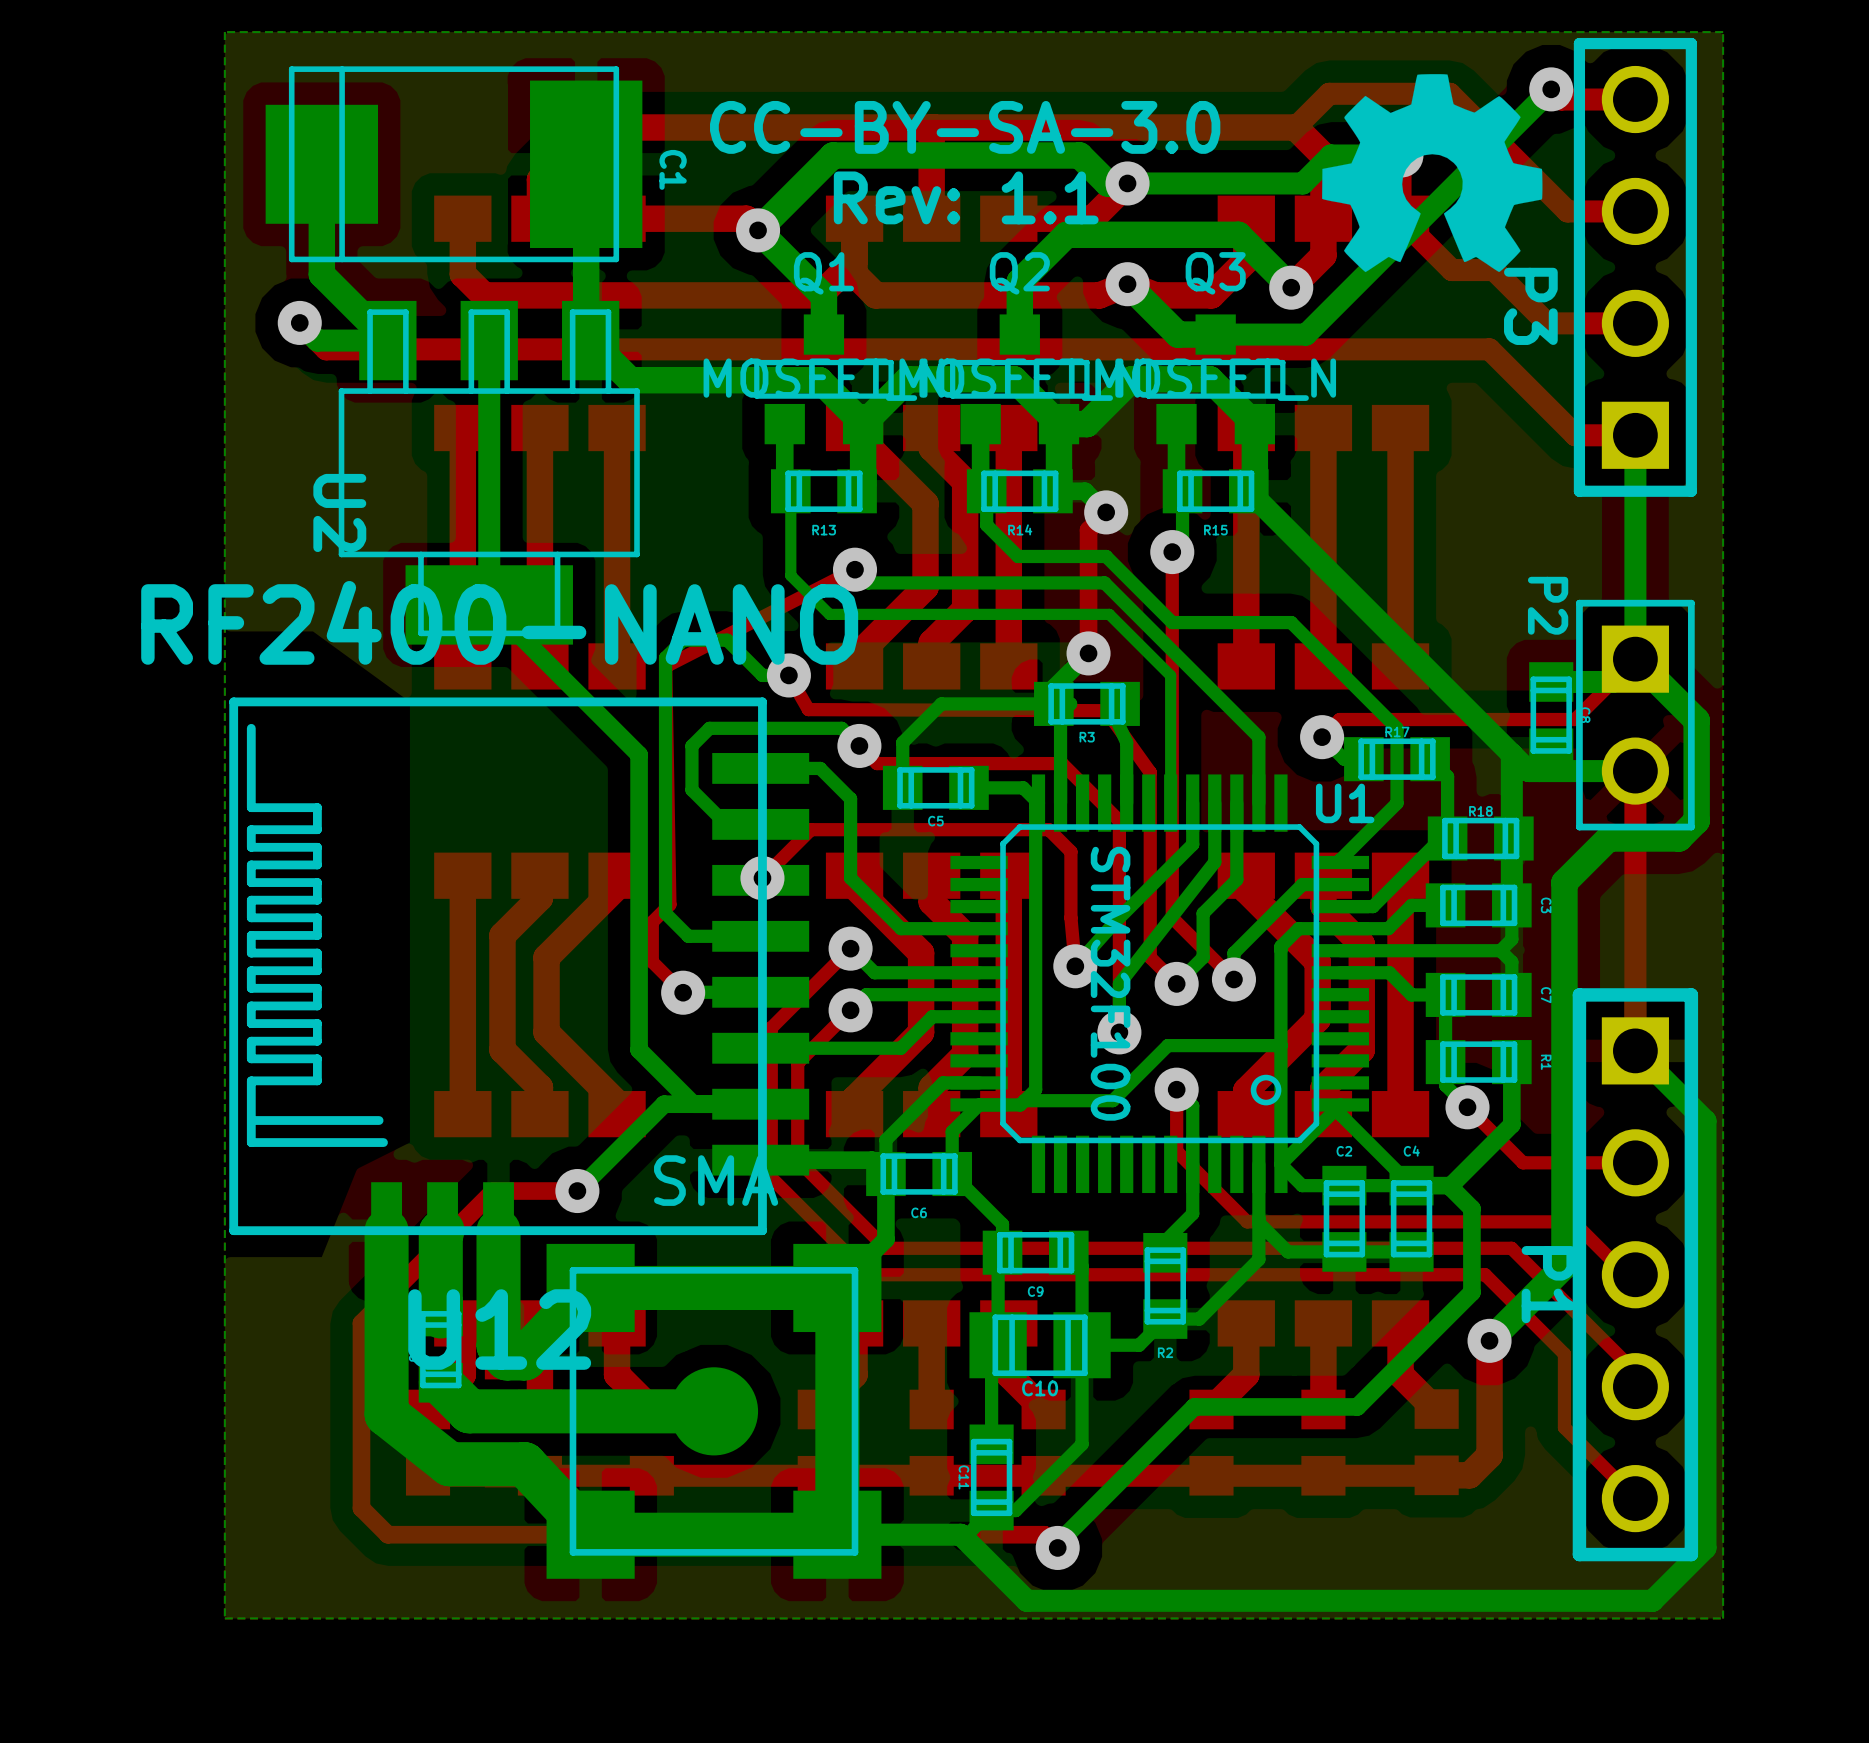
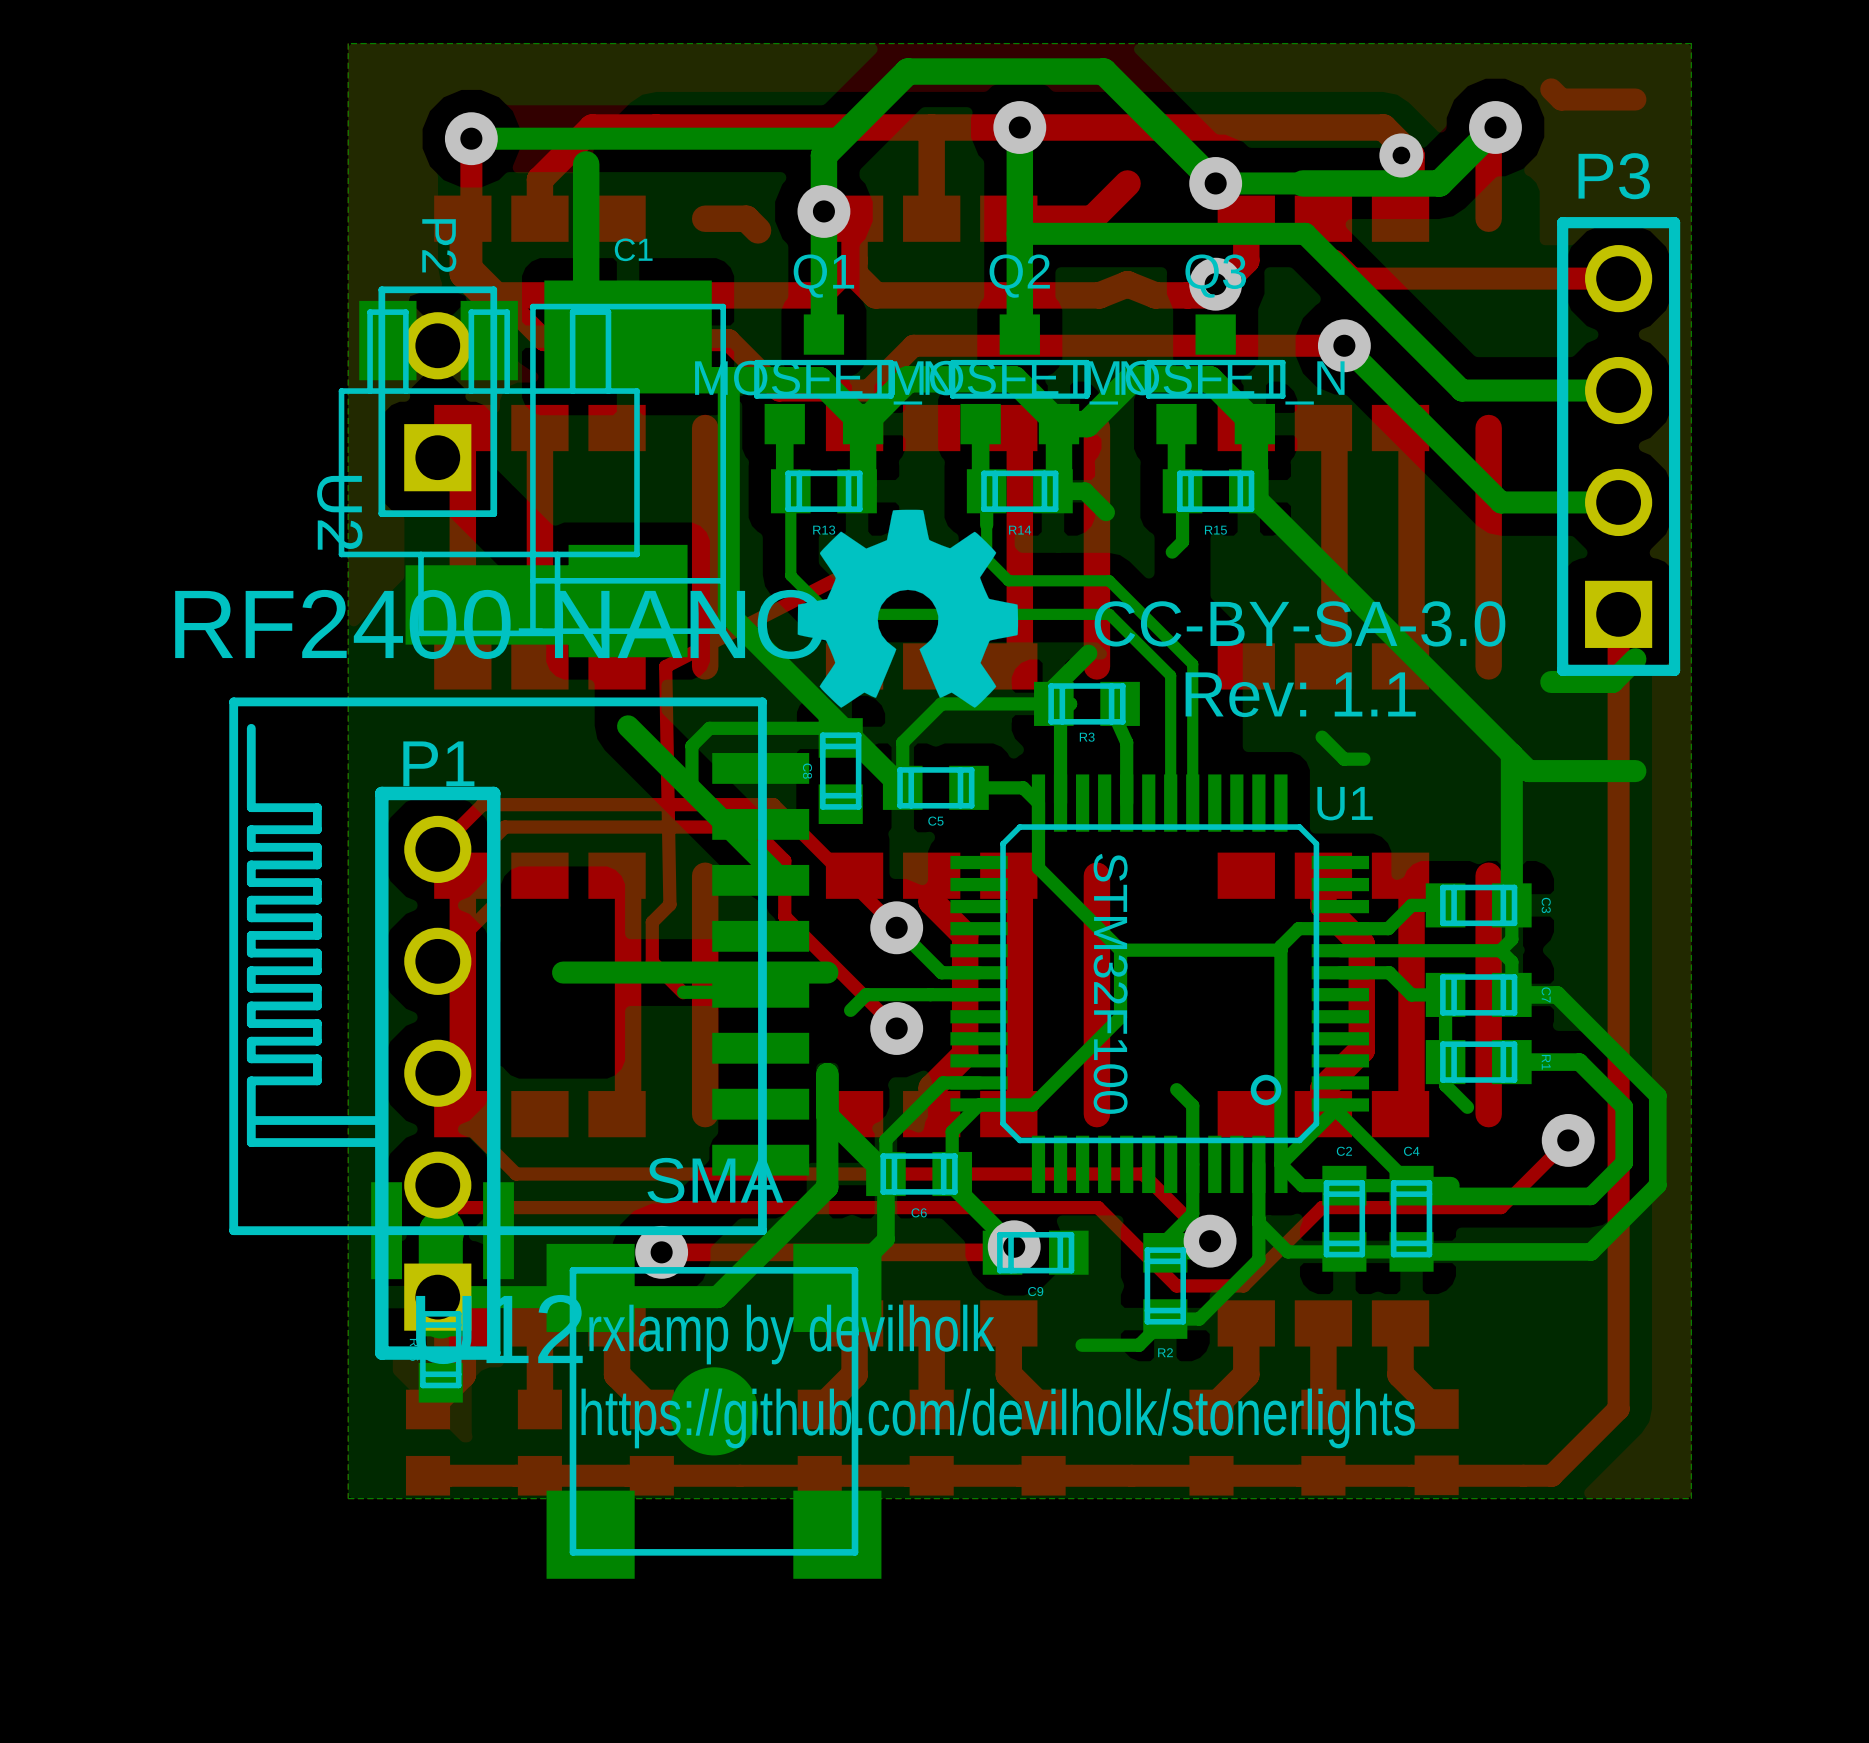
bottom zone outline: (1723, 32) (224, 32) (224, 1618) (1723, 1618) (1723, 32) -> (1691, 43) (1691, 1498) (348, 1498) (348, 43) (1691, 43)
bottom track: (1551, 89) (1306, 334) (1177, 334) (1127, 284) -> none
via: (1551, 89) -> none
text position: CC-BY-SA-3.0 (965, 127) -> CC-BY-SA-3.0 (1299, 623)
via: none -> (1019, 127)
top track: none -> (1295, 127) (1383, 127) (1411, 155) (1411, 218)
top track: none -> (1495, 127) (1488, 134) (1488, 218)
via: none -> (1495, 127)
top track: none -> (471, 138) (471, 267) (544, 340) (728, 340) (779, 390) (868, 390) (913, 345) (1344, 345)
via: none -> (471, 138)
bottom track: none -> (840, 138) (471, 138)
bottom track: (1401, 155) (1330, 155) (1302, 183) -> (1495, 127) (1439, 183) (1302, 183)
top track: (1401, 155) (1400, 218) (1451, 270) (1493, 270) (1547, 323) (1635, 323) -> none
bottom track: (321, 164) (321, 274) (387, 340) (317, 340) (299, 322) -> none
C1 rotation: 0° (454, 164) -> 90° counterclockwise (628, 468)
C1 position: (454, 164) -> (628, 468)
drawing position: (1432, 173) -> (907, 608)
via: (1127, 183) -> none
bottom track: (1215, 183) (1107, 183) (1079, 155) (832, 155) (758, 230) (823, 296) -> (1215, 183) (1103, 71) (907, 71) (823, 155) (823, 296)
via: none -> (1215, 183)
text position: Rev: 1.1 (966, 197) -> Rev: 1.1 (1300, 694)
via: none -> (823, 211)
top track: (1635, 211) (1567, 211) (1449, 93) (1329, 93) (1295, 127) (1323, 155) (1323, 255) (1291, 287) -> none
top track: (705, 218) (617, 218) -> none
via: (758, 230) -> none
bottom track: none -> (1019, 233) (1305, 233) (1461, 390) (1618, 390)
top track: none -> (1334, 260) (1352, 278) (1618, 278)
P3 position: (1635, 267) -> (1618, 446)
bottom track: (1019, 281) (1066, 234) (1238, 234) (1291, 287) -> (1019, 281) (1019, 127)
via: (1127, 284) -> none
via: none -> (1215, 284)
via: (1291, 287) -> none
P3 name rotation: 0° (1530, 306) -> 90° counterclockwise (1614, 176)
P3 name position: P3 (1530, 306) -> P3 (1614, 176)
top track: (299, 322) (326, 349) (1489, 349) (1575, 435) (1635, 435) -> none
via: (299, 322) -> none
bottom track: (489, 340) (489, 604) (639, 754) (639, 1050) (693, 1104) -> none
bottom track: none -> (1344, 345) (1501, 502) (1618, 502)
via: none -> (1344, 345)
bottom track: none -> (728, 379) (728, 614) (902, 787) (852, 737) (840, 737)
top track: (617, 428) (617, 666) -> (705, 428) (705, 666)
top track: (854, 428) (854, 432) (925, 503) (925, 587) (854, 658) (854, 666) -> none
top track: (931, 428) (931, 448) (965, 481) (965, 609) (931, 642) (931, 666) -> none
top track: (1008, 428) (1008, 666) -> (1096, 428) (1096, 666)
top track: none -> (1019, 428) (1019, 666)
top track: (1246, 428) (1246, 666) -> (1334, 428) (1334, 666)
top track: (1323, 428) (1323, 666) -> (1411, 428) (1411, 666)
top track: (1400, 428) (1400, 666) -> (1488, 428) (1488, 666)
bottom track: (1635, 435) (1635, 659) (1696, 720) (1696, 820) (1679, 838) (1608, 838) (1564, 882) (1564, 1265) (1489, 1340) -> none
top track: (1106, 512) (1088, 530) (1088, 653) -> none
via: (1106, 512) -> none
bottom track: (986, 525) (1018, 556) (1106, 556) (1172, 622) (1291, 622) (1397, 728) (1397, 803) (1340, 859) (1340, 862) -> (986, 525) (986, 558) (1008, 580) (1109, 580) (1192, 664) (1192, 803)
top track: (1172, 552) (1172, 917) (1233, 979) -> none
via: (1172, 552) -> none
bottom track: (855, 569) (868, 582) (1104, 582) (1258, 737) (1258, 803) -> none
via: (855, 569) -> none
P2 name position: P2 (1548, 605) -> P2 (439, 245)
via: (1088, 653) -> none
top track: (1635, 659) (1575, 719) (1339, 719) (1322, 737) -> none
bottom track: (788, 675) (762, 675) (727, 640) (683, 640) (665, 657) (665, 913) (688, 936) (760, 936) -> none
top track: (788, 675) (808, 709) (1106, 710) (1150, 772) (1150, 957) (1176, 983) -> none
via: (788, 675) -> none
C8 rotation: 0° (1551, 715) -> 180° (840, 771)
C8 position: (1551, 715) -> (840, 771)
P2 rotation: 0° (1635, 715) -> 180° (437, 401)
P2 position: (1635, 715) -> (437, 401)
via: (1322, 737) -> none
top track: (859, 745) (877, 763) (1062, 763) (1119, 820) (1119, 1032) -> none
via: (859, 745) -> none
R17: (1397, 759) -> none
bottom track: (1430, 759) (1447, 776) (1447, 838) (1441, 838) (1372, 906) (1340, 906) -> none
bottom track: (760, 768) (820, 768) (850, 798) (850, 878) (901, 928) (979, 928) -> none
top track: (1635, 771) (1635, 1050) -> none
bottom track width: thin (691, 790) (726, 824) -> thick (691, 790) (726, 824)
bottom track: (1038, 803) (1035, 805) (1035, 1089) (1020, 1104) -> (1120, 950) (1120, 1017) (1032, 1104) (1020, 1104)
bottom track: none -> (1038, 803) (1038, 868) (1120, 950)
bottom track: (1192, 803) (1192, 844) (1114, 922) (1075, 966) -> none
bottom track: (1214, 803) (1214, 862) (1119, 983) (1119, 1032) -> none
bottom track: (1236, 803) (1236, 879) (1203, 913) (1203, 957) (1176, 983) -> none
R18: (1480, 838) -> none
top track: none -> (437, 849) (482, 804) (773, 804) (896, 927)
top track: (539, 875) (539, 897) (502, 935) (502, 1050) (539, 1087) (539, 1114) -> none
top track: (617, 875) (617, 886) (546, 957) (546, 1032) (617, 1102) (617, 1114) -> none
top track: none -> (628, 875) (628, 1114)
top track: none -> (705, 875) (705, 1114)
top track: (854, 875) (854, 886) (921, 953) (921, 1032) (854, 1098) (854, 1114) -> none
top track: (1008, 875) (1008, 1114) -> (1096, 875) (1096, 1114)
top track: none -> (1019, 875) (1019, 1114)
top track: (1246, 875) (1246, 890) (1317, 961) (1317, 1019) (1246, 1090) (1246, 1114) -> none
top track: (1400, 875) (1400, 1114) -> (1488, 875) (1488, 1114)
top track: none -> (1411, 875) (1411, 1114)
top track: (762, 878) (810, 829) (1048, 829) (1070, 851) (1070, 917) (1075, 966) -> none
via: (762, 878) -> none
bottom track: (1340, 884) (1302, 884) (1233, 953) (1233, 979) -> none
via: none -> (896, 927)
bottom track: (850, 948) (874, 972) (941, 972) -> (896, 927) (941, 972)
top track: (850, 948) (771, 1027) (771, 1177) (868, 1274) (1485, 1274) (1564, 1354) (1564, 1427) (1635, 1498) -> none
via: (850, 948) -> none
bottom track: none -> (1280, 950) (1120, 950)
top track: none -> (437, 961) (493, 905) (493, 838) (504, 827) (751, 827) (784, 860) (784, 916) (896, 1028)
via: (1075, 966) -> none
bottom track: none -> (827, 972) (563, 972)
via: (1233, 979) -> none
via: (1176, 983) -> none
via: (683, 992) -> none
bottom track: none -> (1511, 994) (1557, 994) (1657, 1095) (1657, 1185) (1591, 1251) (1411, 1251)
top track: (850, 1010) (797, 1063) (797, 1160) (885, 1248) (1511, 1248) (1635, 1372) (1635, 1386) -> none
via: (850, 1010) -> none
bottom track: (979, 1016) (932, 1016) (900, 1048) (760, 1048) -> none
via: none -> (896, 1028)
via: (1119, 1032) -> none
bottom track: (1280, 1045) (1167, 1045) (1112, 1100) (1024, 1100) -> none
bottom track: (1635, 1050) (1705, 1120) (1705, 1547) (1652, 1600) (1026, 1600) (960, 1534) (837, 1534) -> none
bottom track: (1511, 1062) (1511, 1124) (1450, 1185) (1471, 1208) (1471, 1292) (1357, 1406) (1194, 1406) (1057, 1543) (1057, 1547) -> (1511, 1062) (1579, 1062) (1624, 1106) (1624, 1162) (1590, 1196) (1422, 1196) (1411, 1185)
top track: none -> (437, 1073) (437, 1095) (516, 1174) (1142, 1174) (1210, 1241)
bottom track: none -> (827, 1073) (827, 1187) (717, 1297) (437, 1297)
top track: (1176, 1089) (1176, 1151) (1247, 1221) (1573, 1221) (1626, 1274) (1635, 1274) -> none
via: (1176, 1089) -> none
bottom track: (760, 1104) (664, 1104) (577, 1191) -> none
top track: (1467, 1107) (1523, 1162) (1635, 1162) -> none
via: (1467, 1107) -> none
top track: none -> (1568, 1140) (1501, 1207) (1322, 1207) (1243, 1285) (1176, 1285) (1098, 1207) (460, 1207) (437, 1185)
via: none -> (1568, 1140)
bottom track: (872, 1160) (760, 1160) -> (872, 1160) (827, 1115)
bottom track: (952, 1174) (1002, 1224) (1002, 1252) (998, 1257) (998, 1345) (991, 1351) (991, 1444) -> (952, 1174) (952, 1184) (1014, 1246)
top track: (577, 1191) (493, 1191) (361, 1323) (361, 1508) (387, 1534) (1044, 1534) (1057, 1547) -> none
via: (577, 1191) -> none
bottom track: (386, 1230) (386, 1414) (449, 1464) (524, 1464) (590, 1534) (837, 1534) -> none
bottom track: (498, 1230) (498, 1345) (506, 1358) (524, 1358) (590, 1287) (837, 1287) (837, 1534) -> none
via: none -> (1210, 1241)
top track: none -> (1014, 1246) (1008, 1252) (661, 1252)
via: none -> (1014, 1246)
via: none -> (661, 1252)
bottom track: (1068, 1252) (1082, 1265) (1082, 1444) (1015, 1510) (991, 1510) (967, 1534) (837, 1534) -> none
P1 rotation: 0° (1635, 1274) -> 180° (437, 1073)
P1 position: (1635, 1274) -> (437, 1073)
P1 name position: P1 (1548, 1284) -> P1 (438, 763)
text: none -> rxlamp by devilholk (791, 1334)
top track: (1489, 1340) (1489, 1455) (1469, 1475) (1436, 1475) -> (1618, 614) (1618, 1409) (1551, 1475) (1435, 1475)
via: (1489, 1340) -> none
C10: (1040, 1345) -> none
bottom track: (440, 1382) (469, 1411) (713, 1411) -> none
text: none -> https://github.com/devilholk/stonerlights (998, 1418)
C11: (991, 1477) -> none
via: (1057, 1547) -> none

